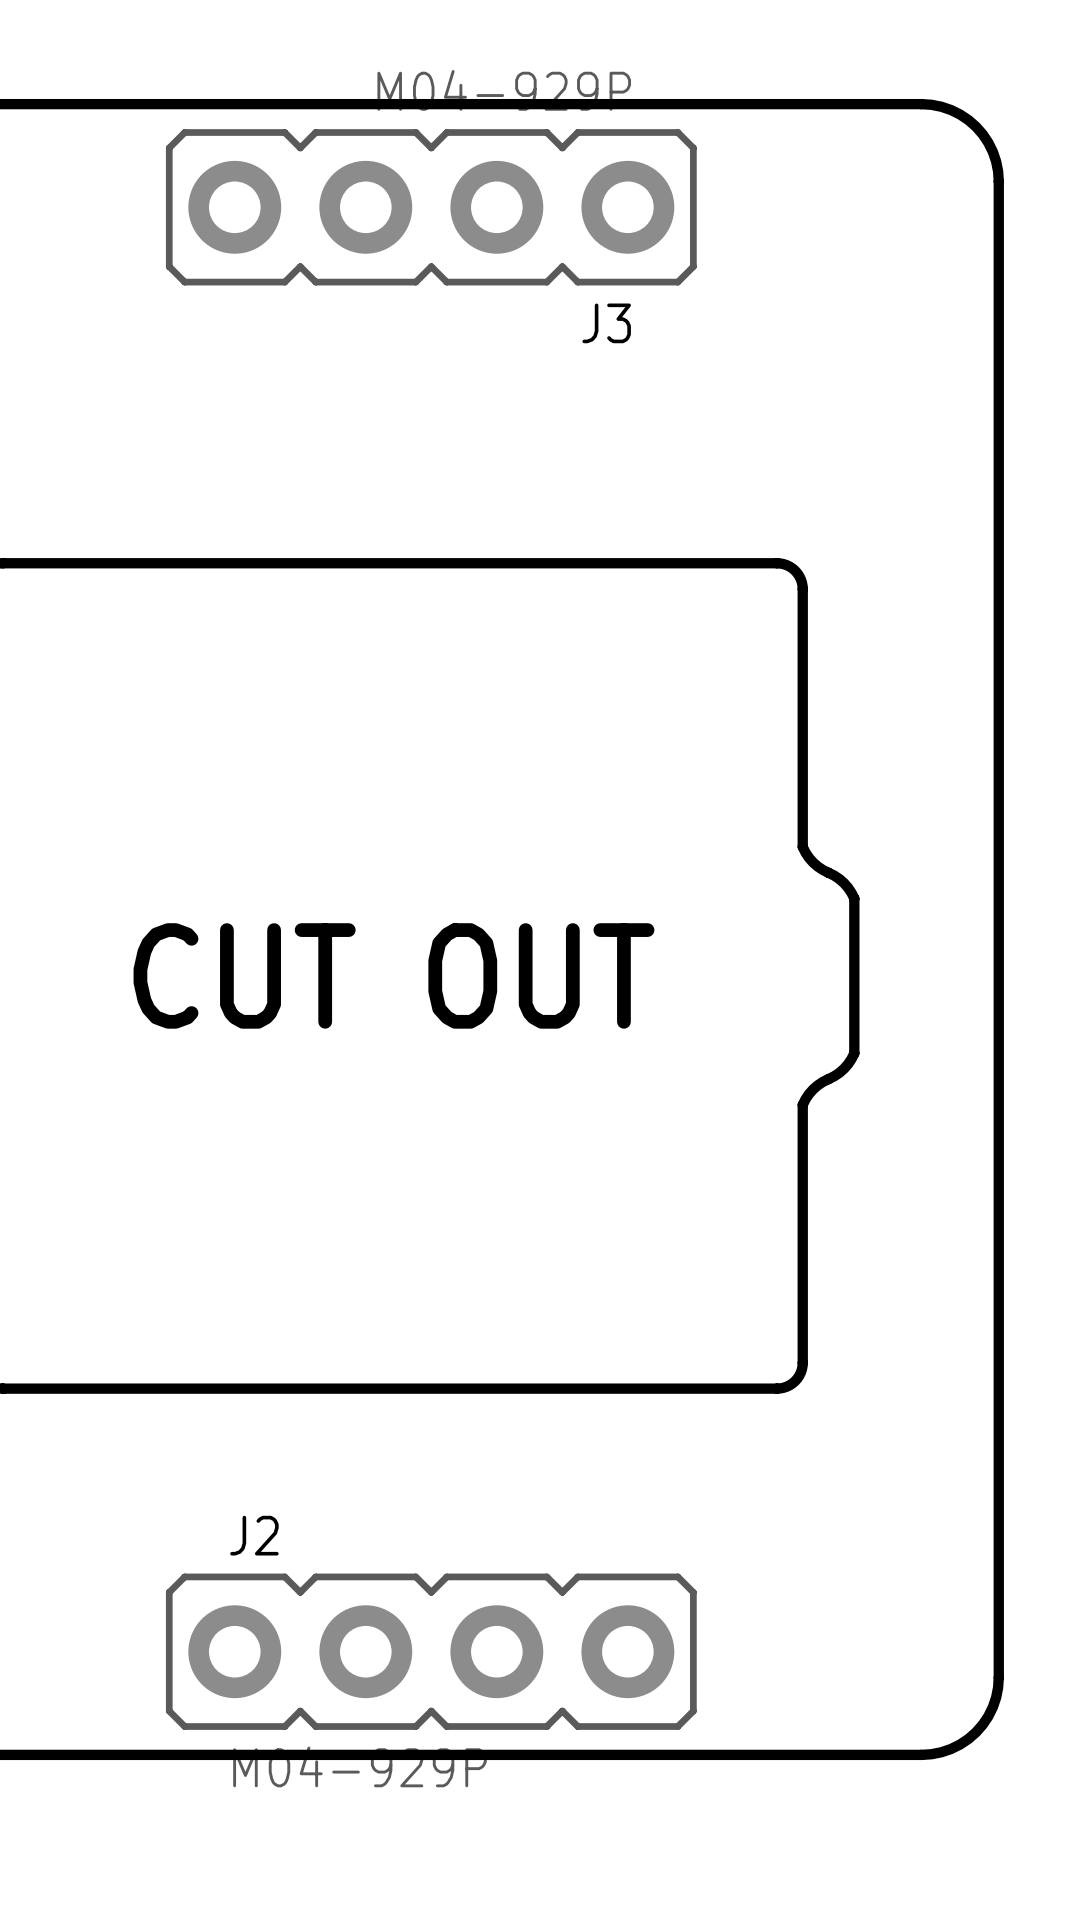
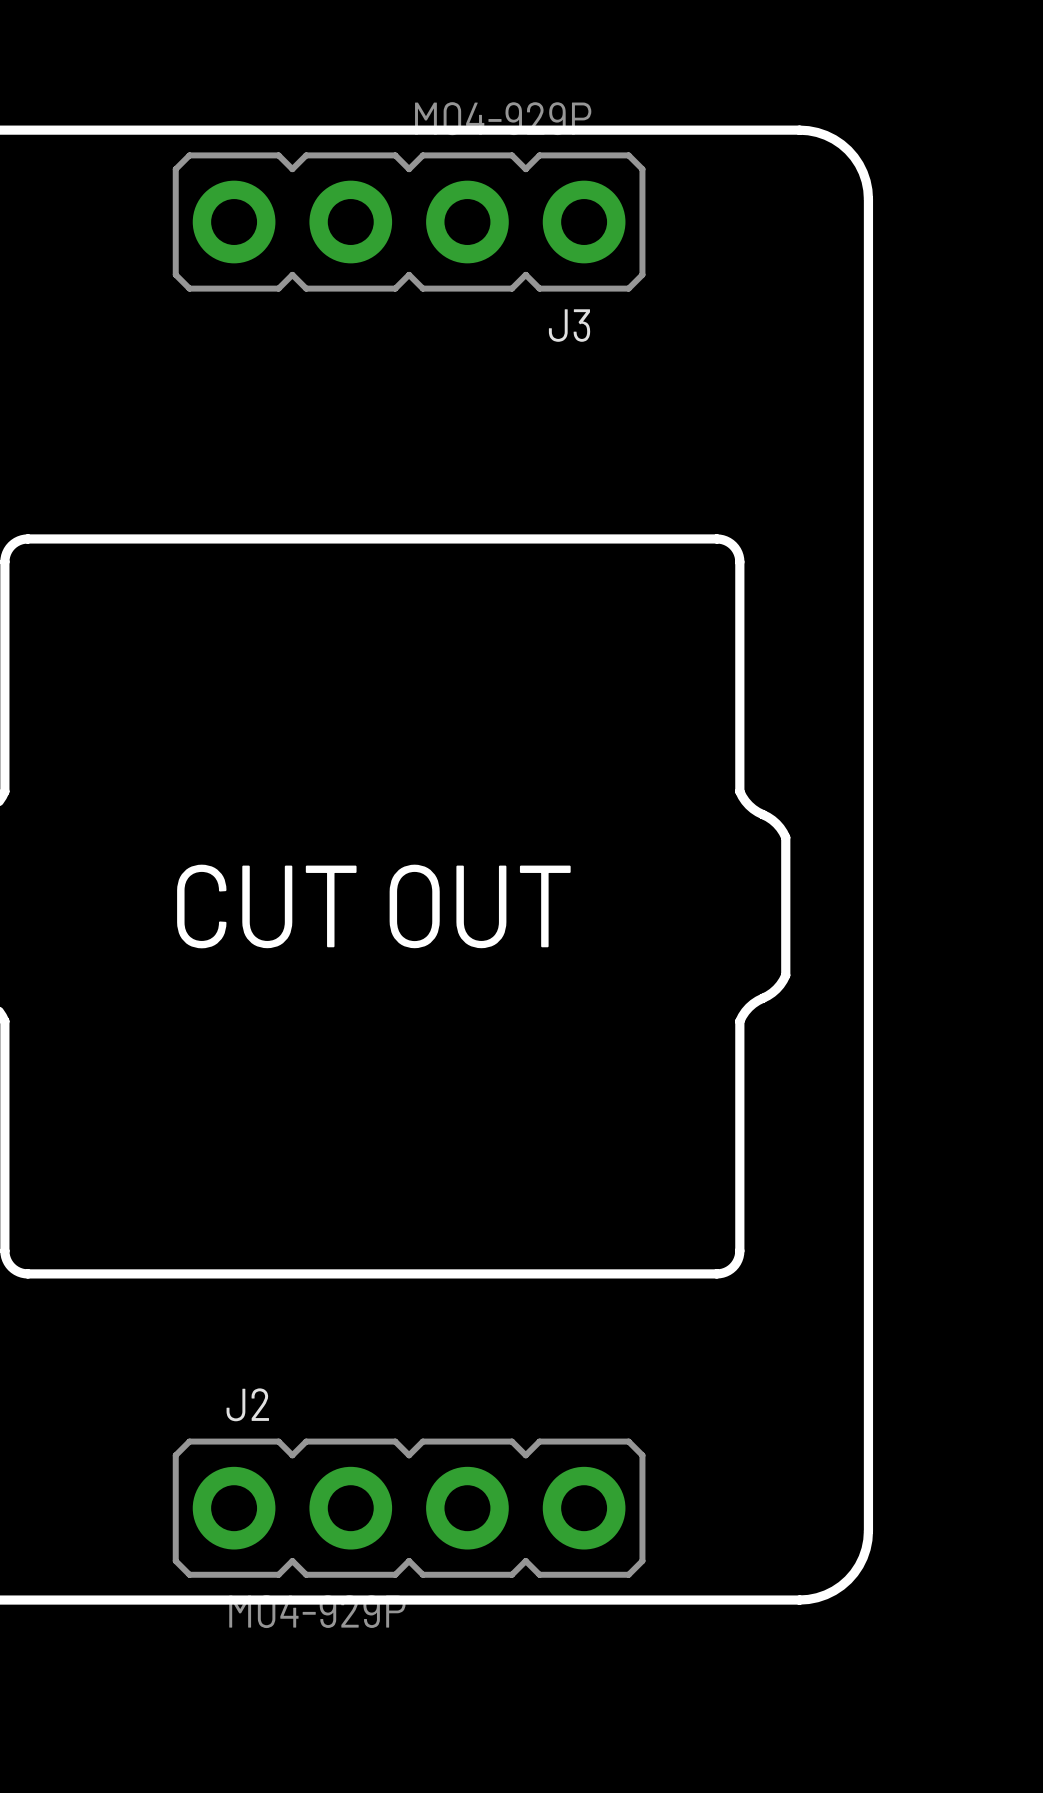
board edge: (869, 104) (931, 104) (960, 114) (976, 126) (988, 142) (996, 161) (998, 181) (998, 1687) (988, 1716) (976, 1732) (960, 1744) (931, 1754) (869, 1754) -> (799, 130) (825, 135) (848, 150) (863, 172) (868, 199) (868, 1531) (863, 1557) (848, 1579) (825, 1594) (799, 1600)

